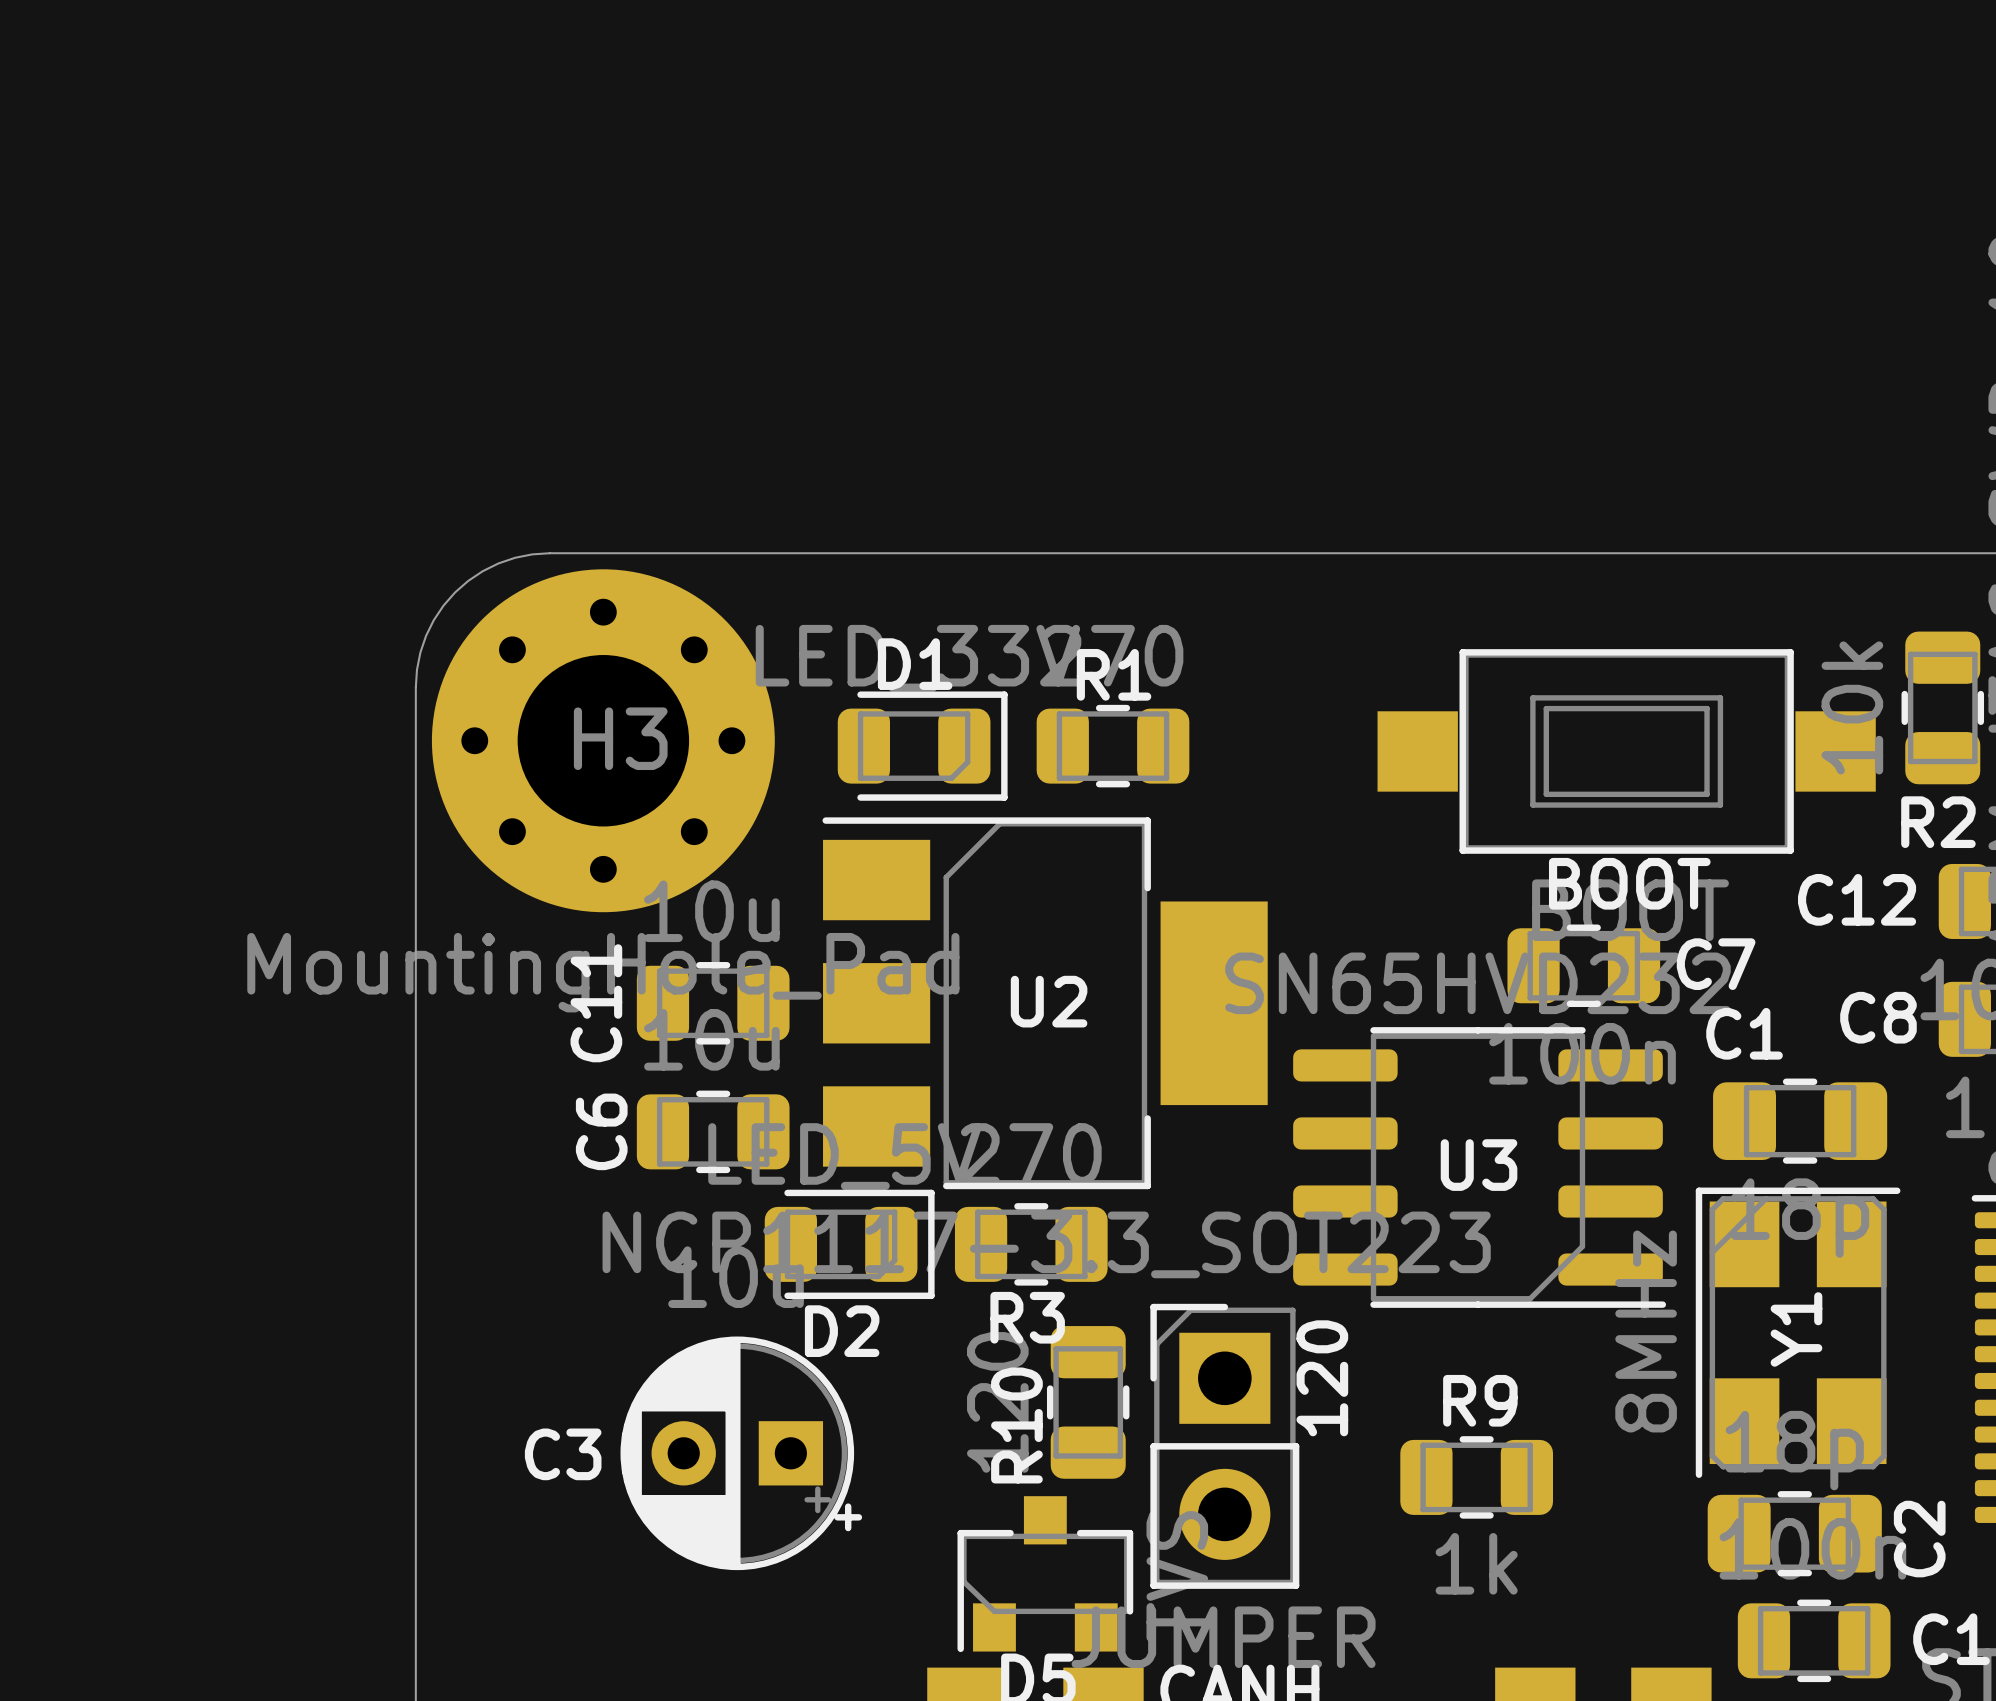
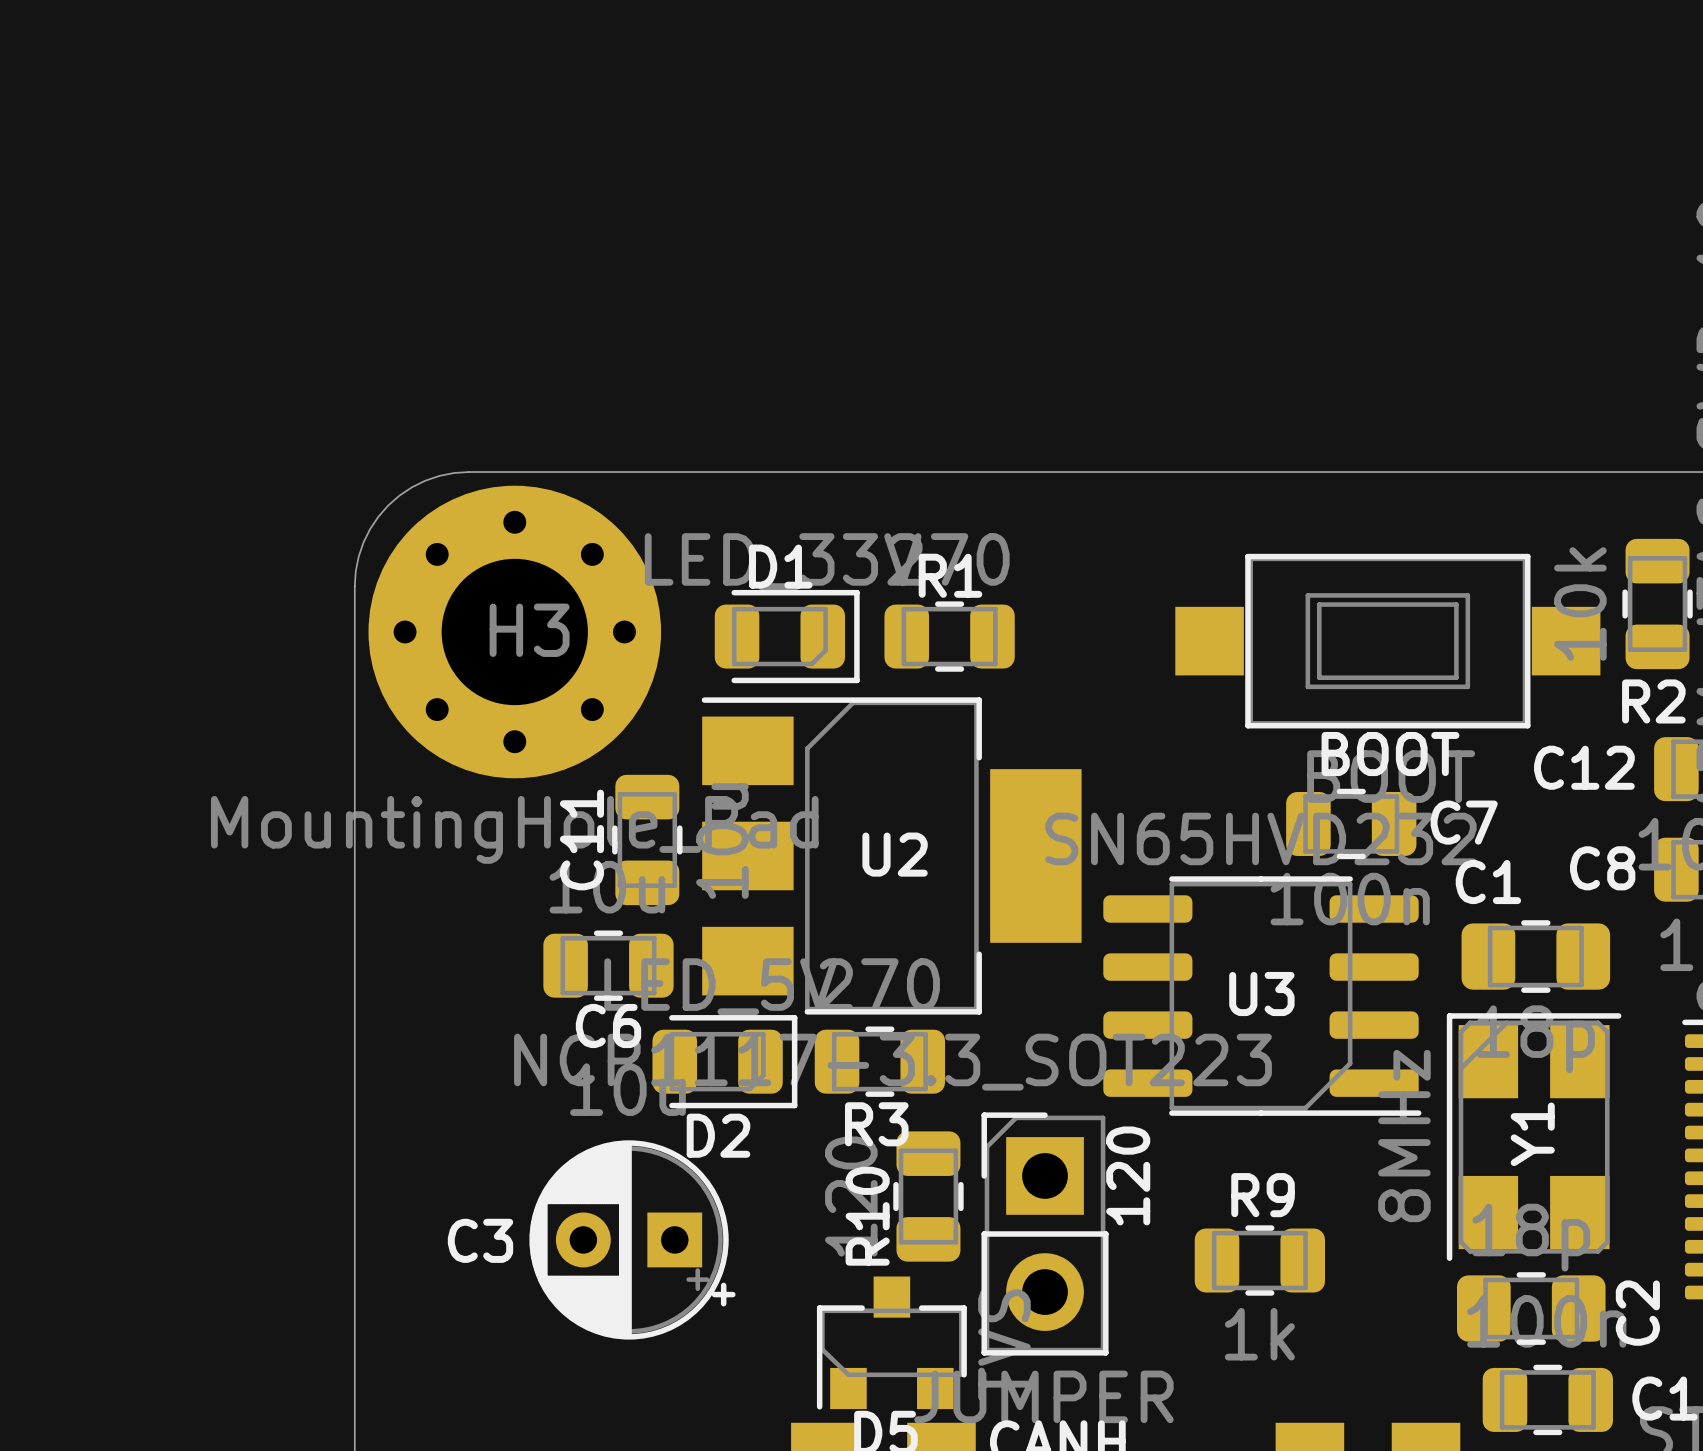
C11 rotation: 0° (713, 1003) -> 90° clockwise (647, 839)
C6 name rotation: 0° (601, 1131) -> 90° clockwise (608, 1026)
C6 name position: C6 (601, 1131) -> C6 (608, 1026)

